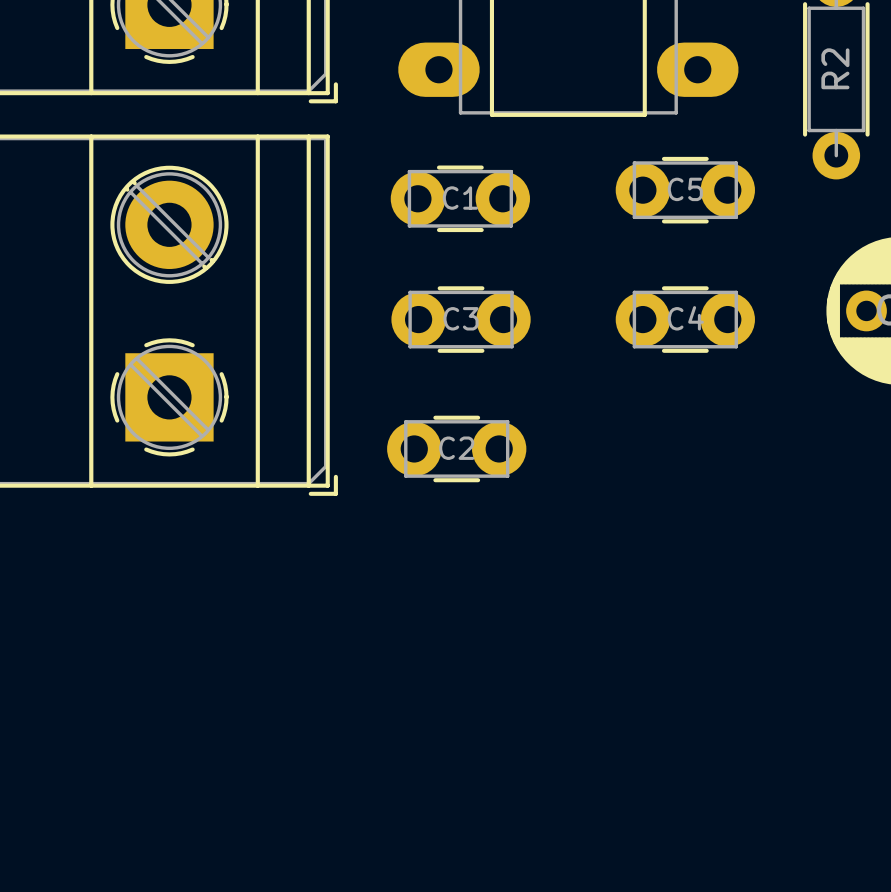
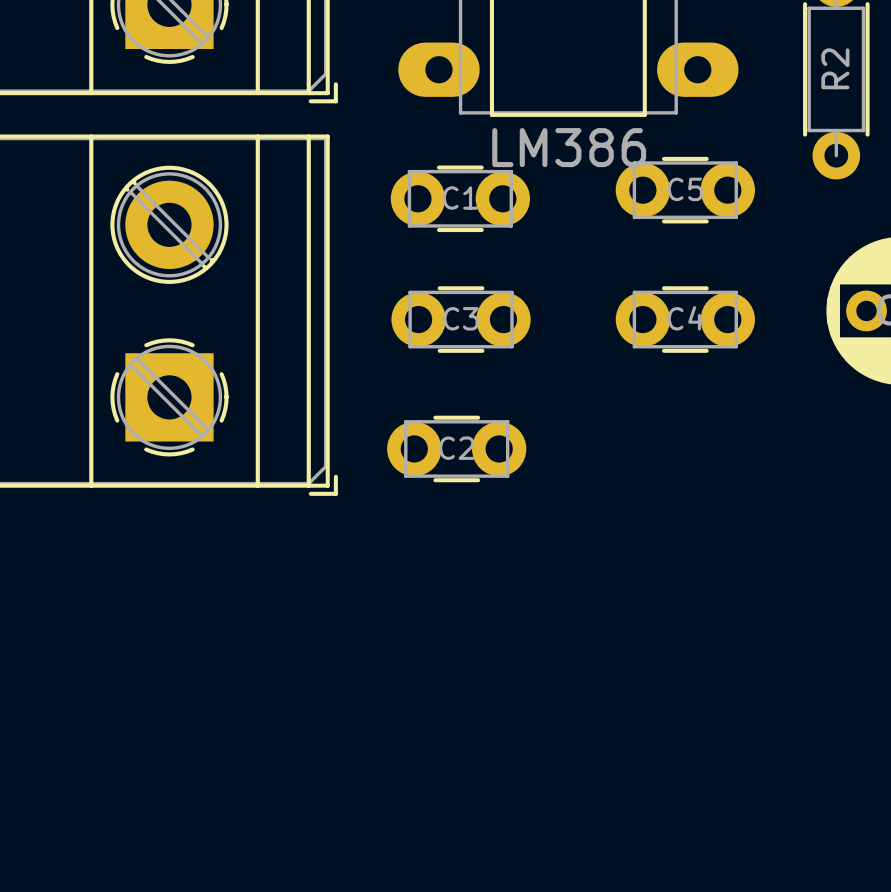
part value: none -> LM386 (569, 147)

